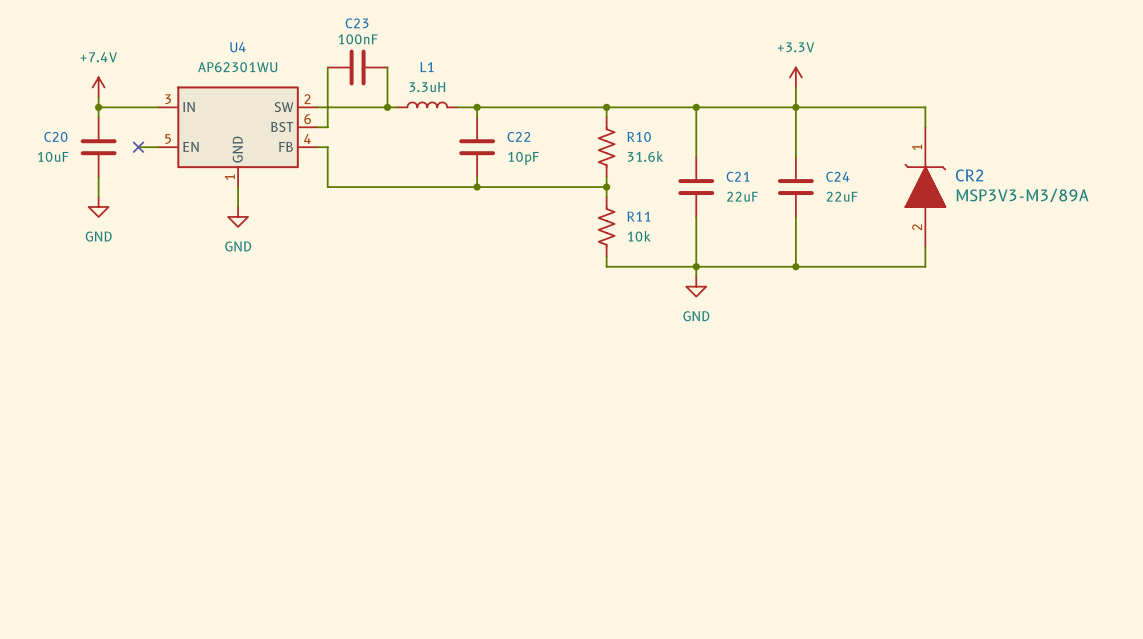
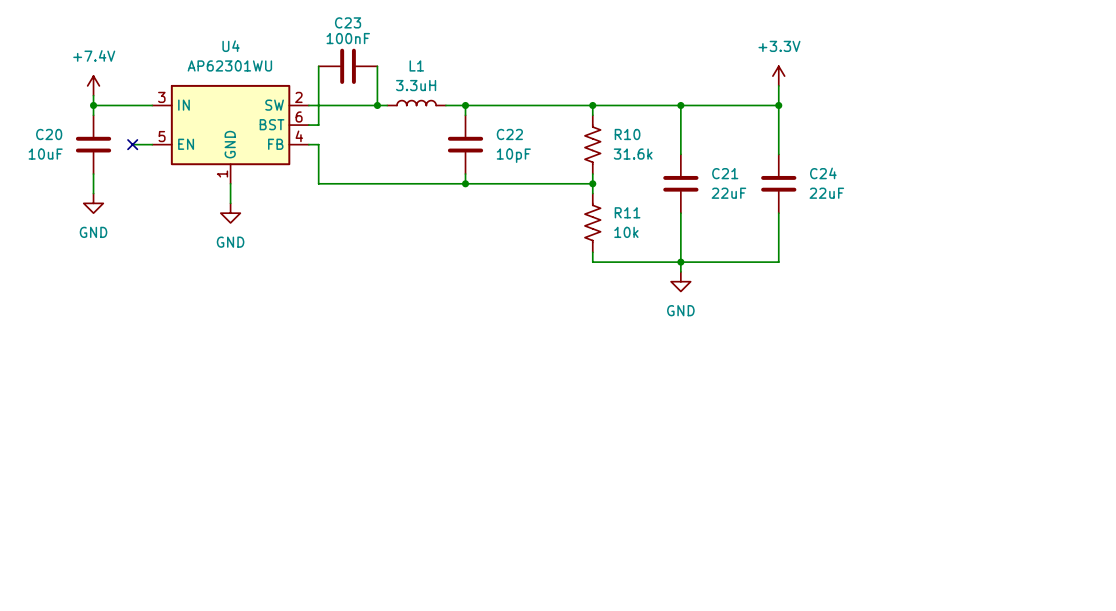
wire: (795, 107) (925, 107) (925, 127) -> none
CR2: MSP3V3-M3/89A (925, 187) -> none
wire: (925, 246) (925, 266) (795, 266) -> none
junction: (795, 266) -> none

